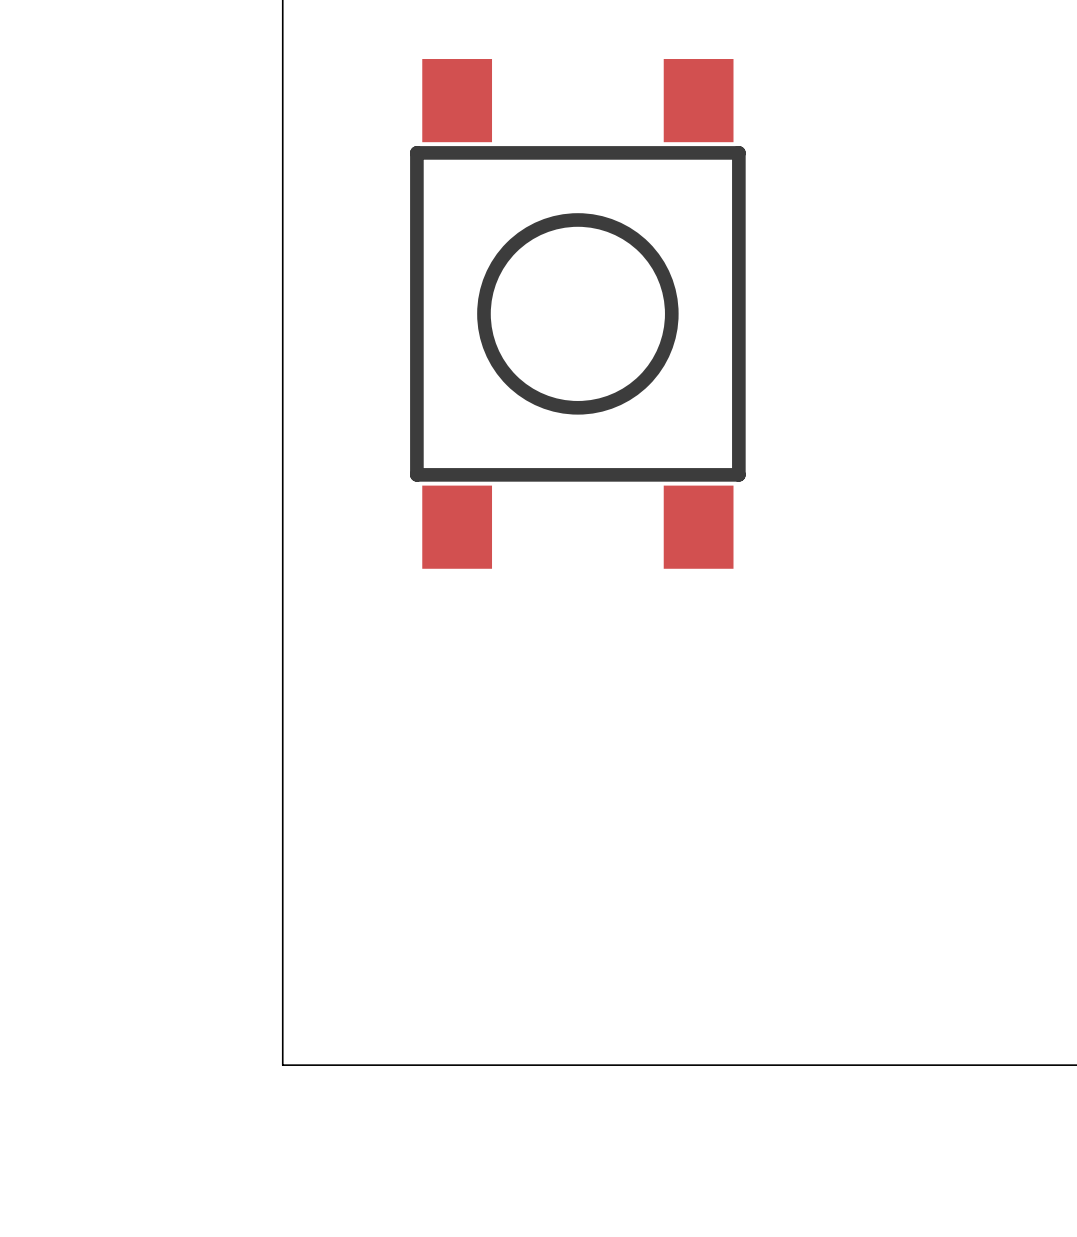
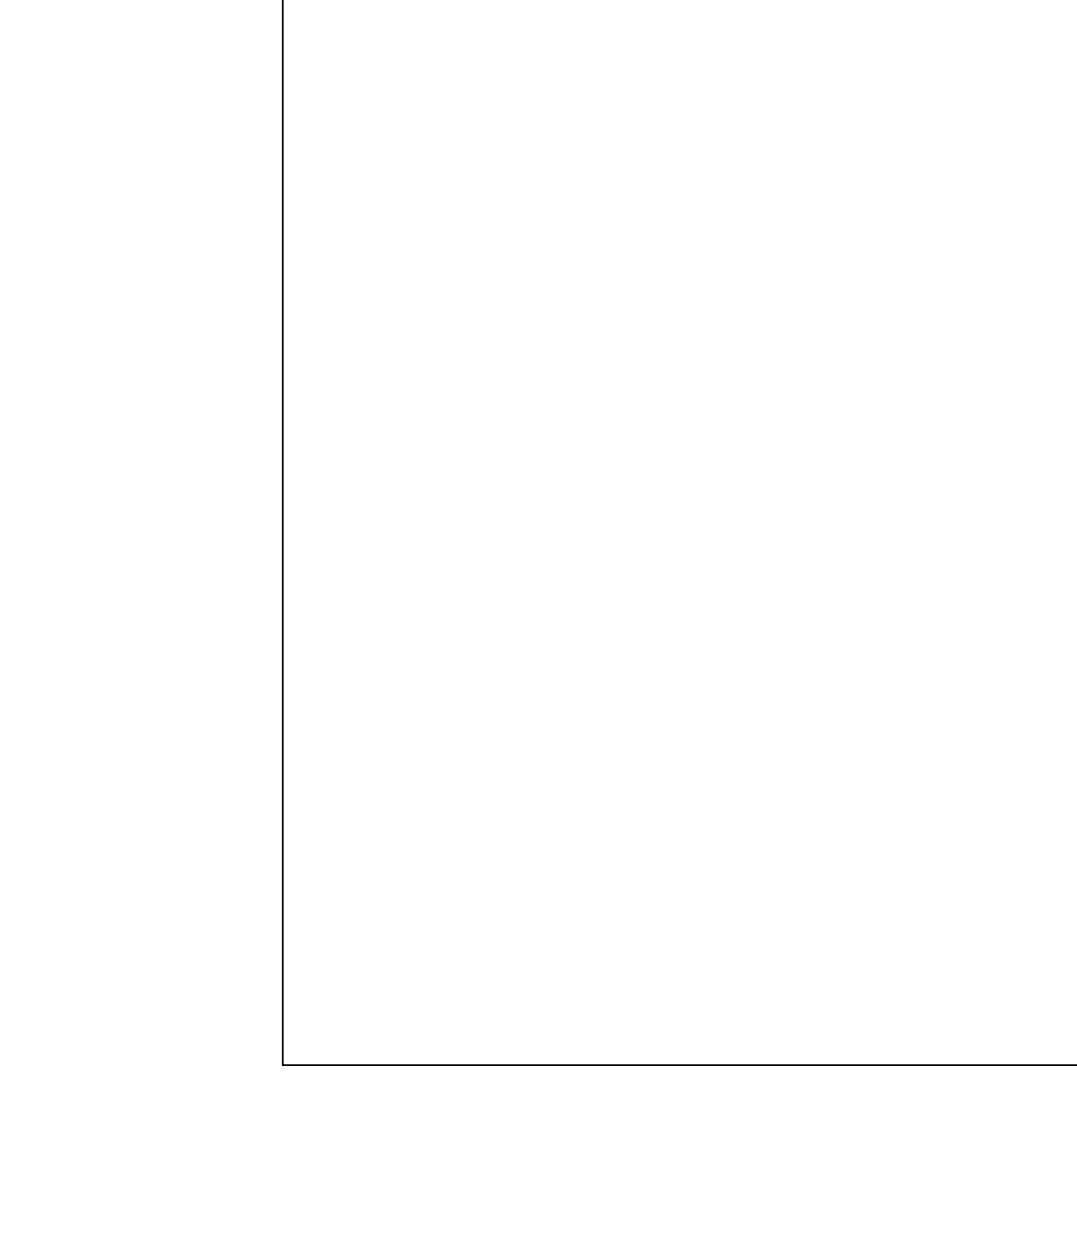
part: (577, 313) -> none

